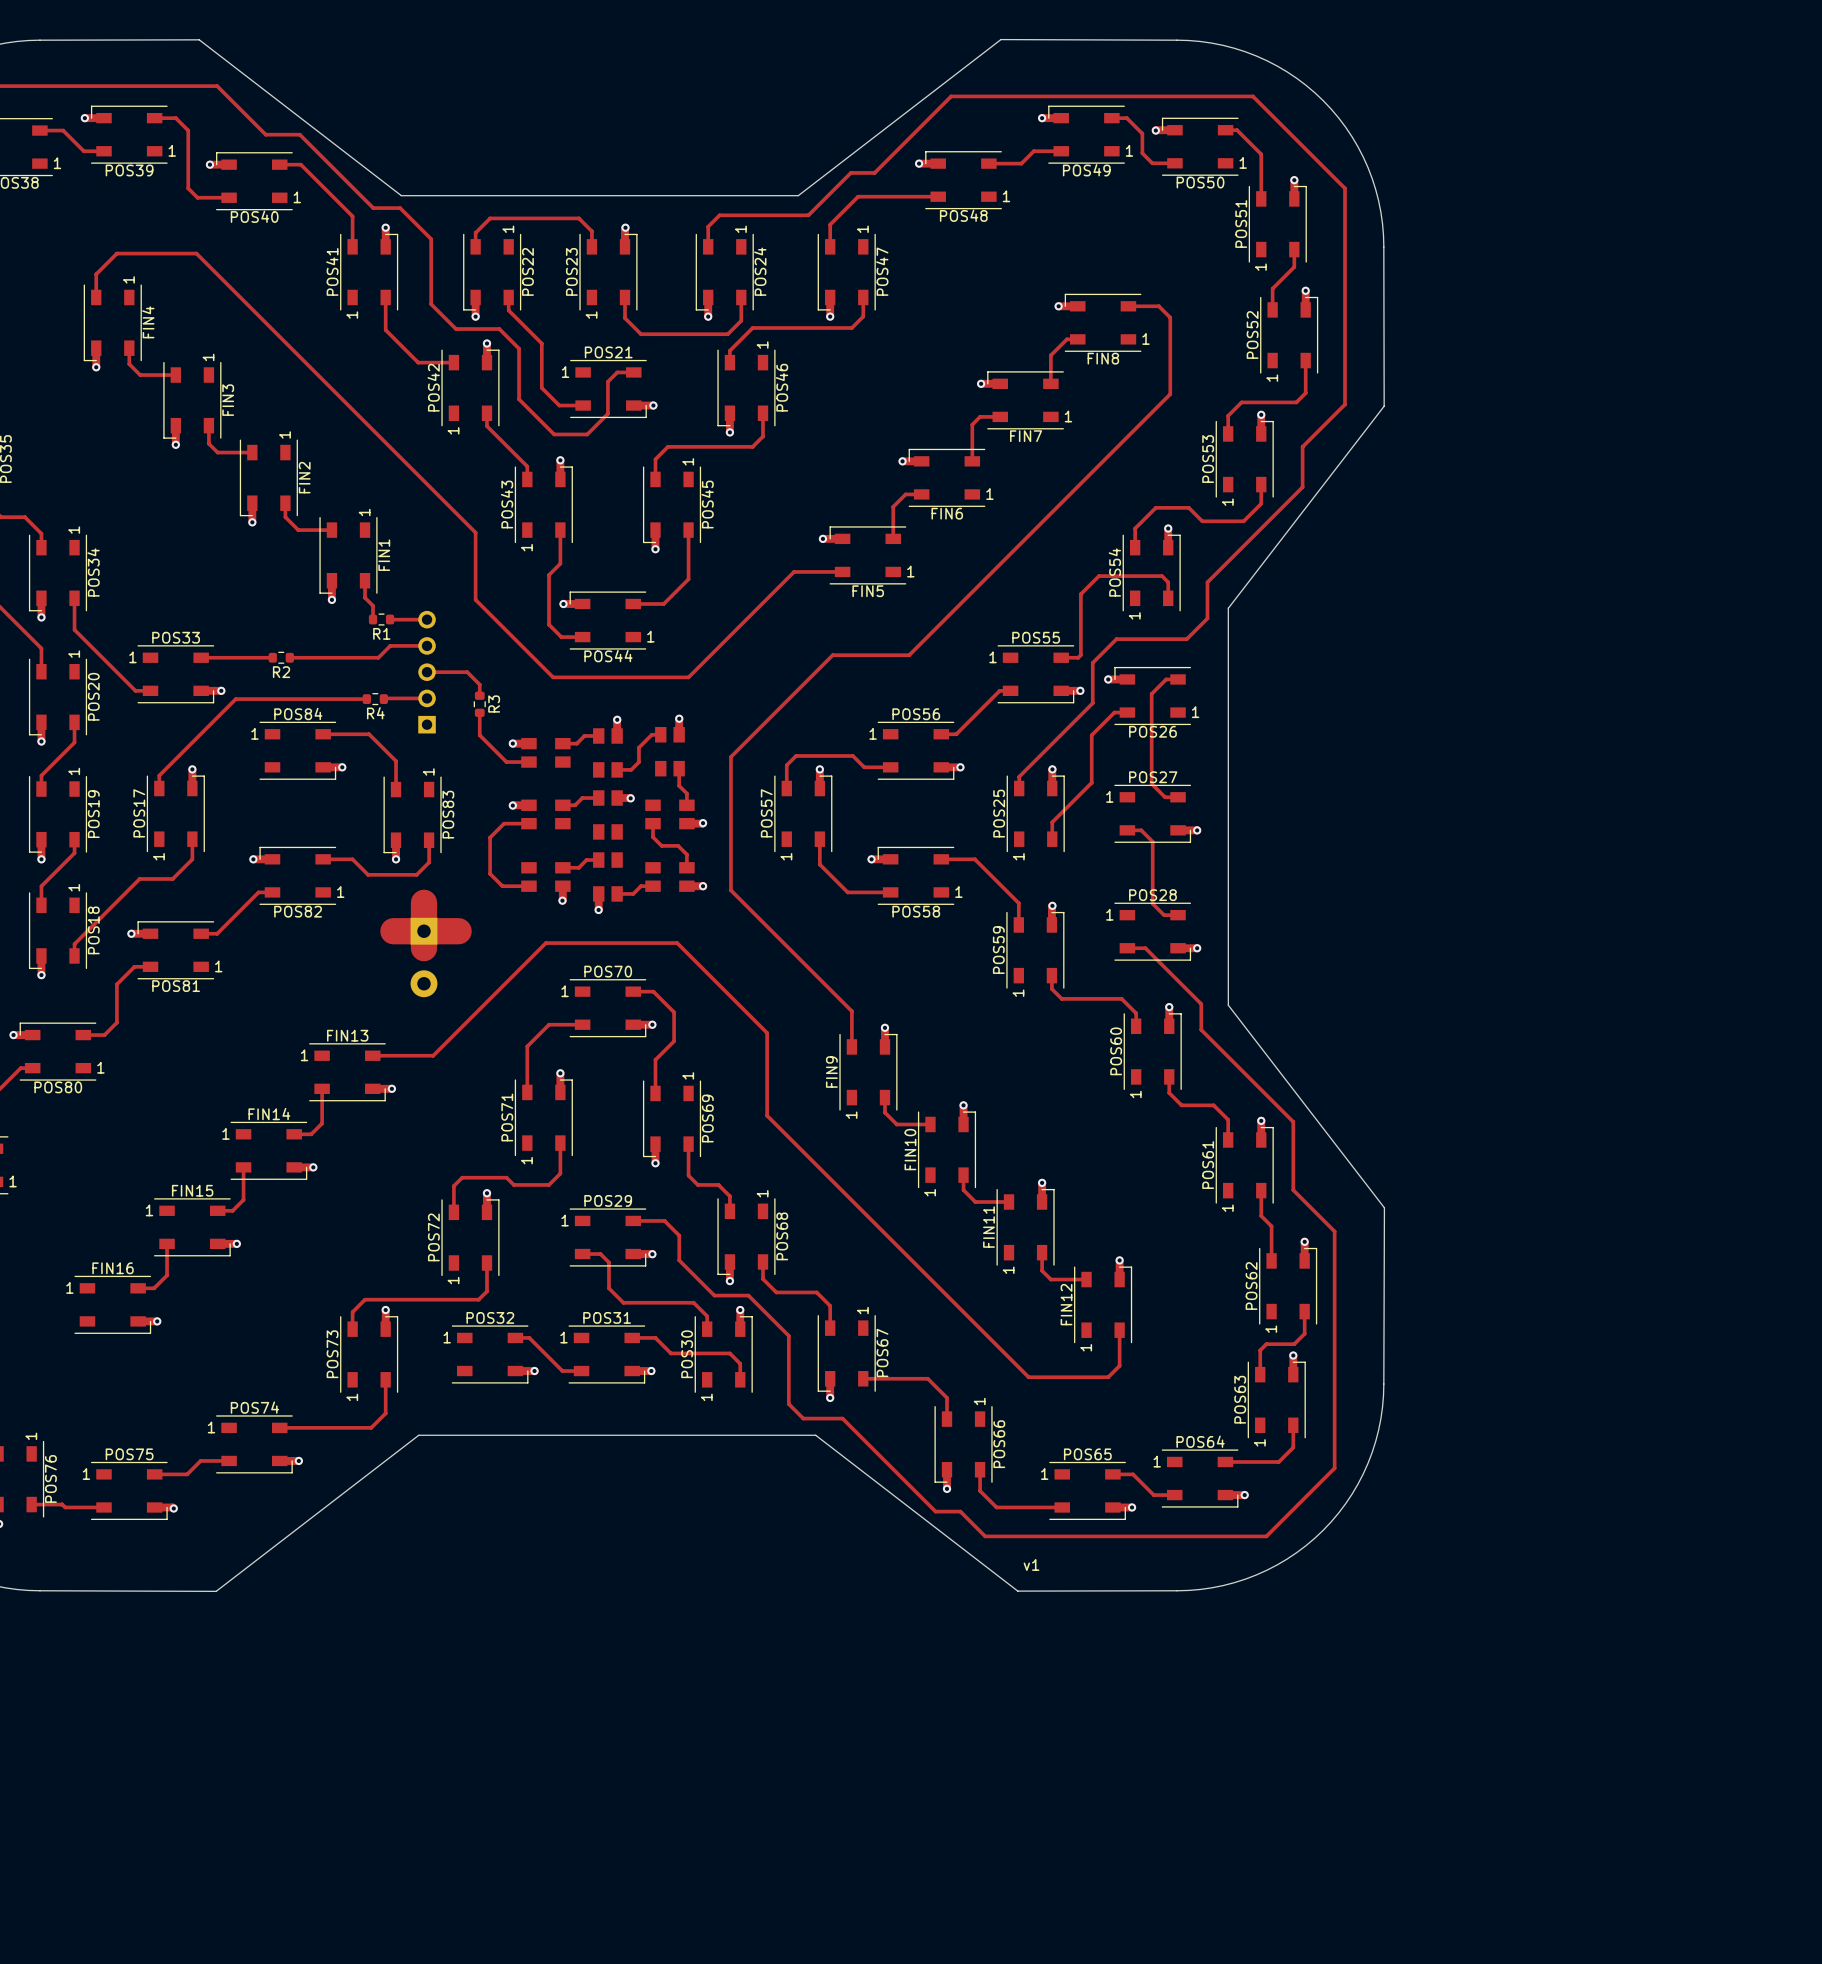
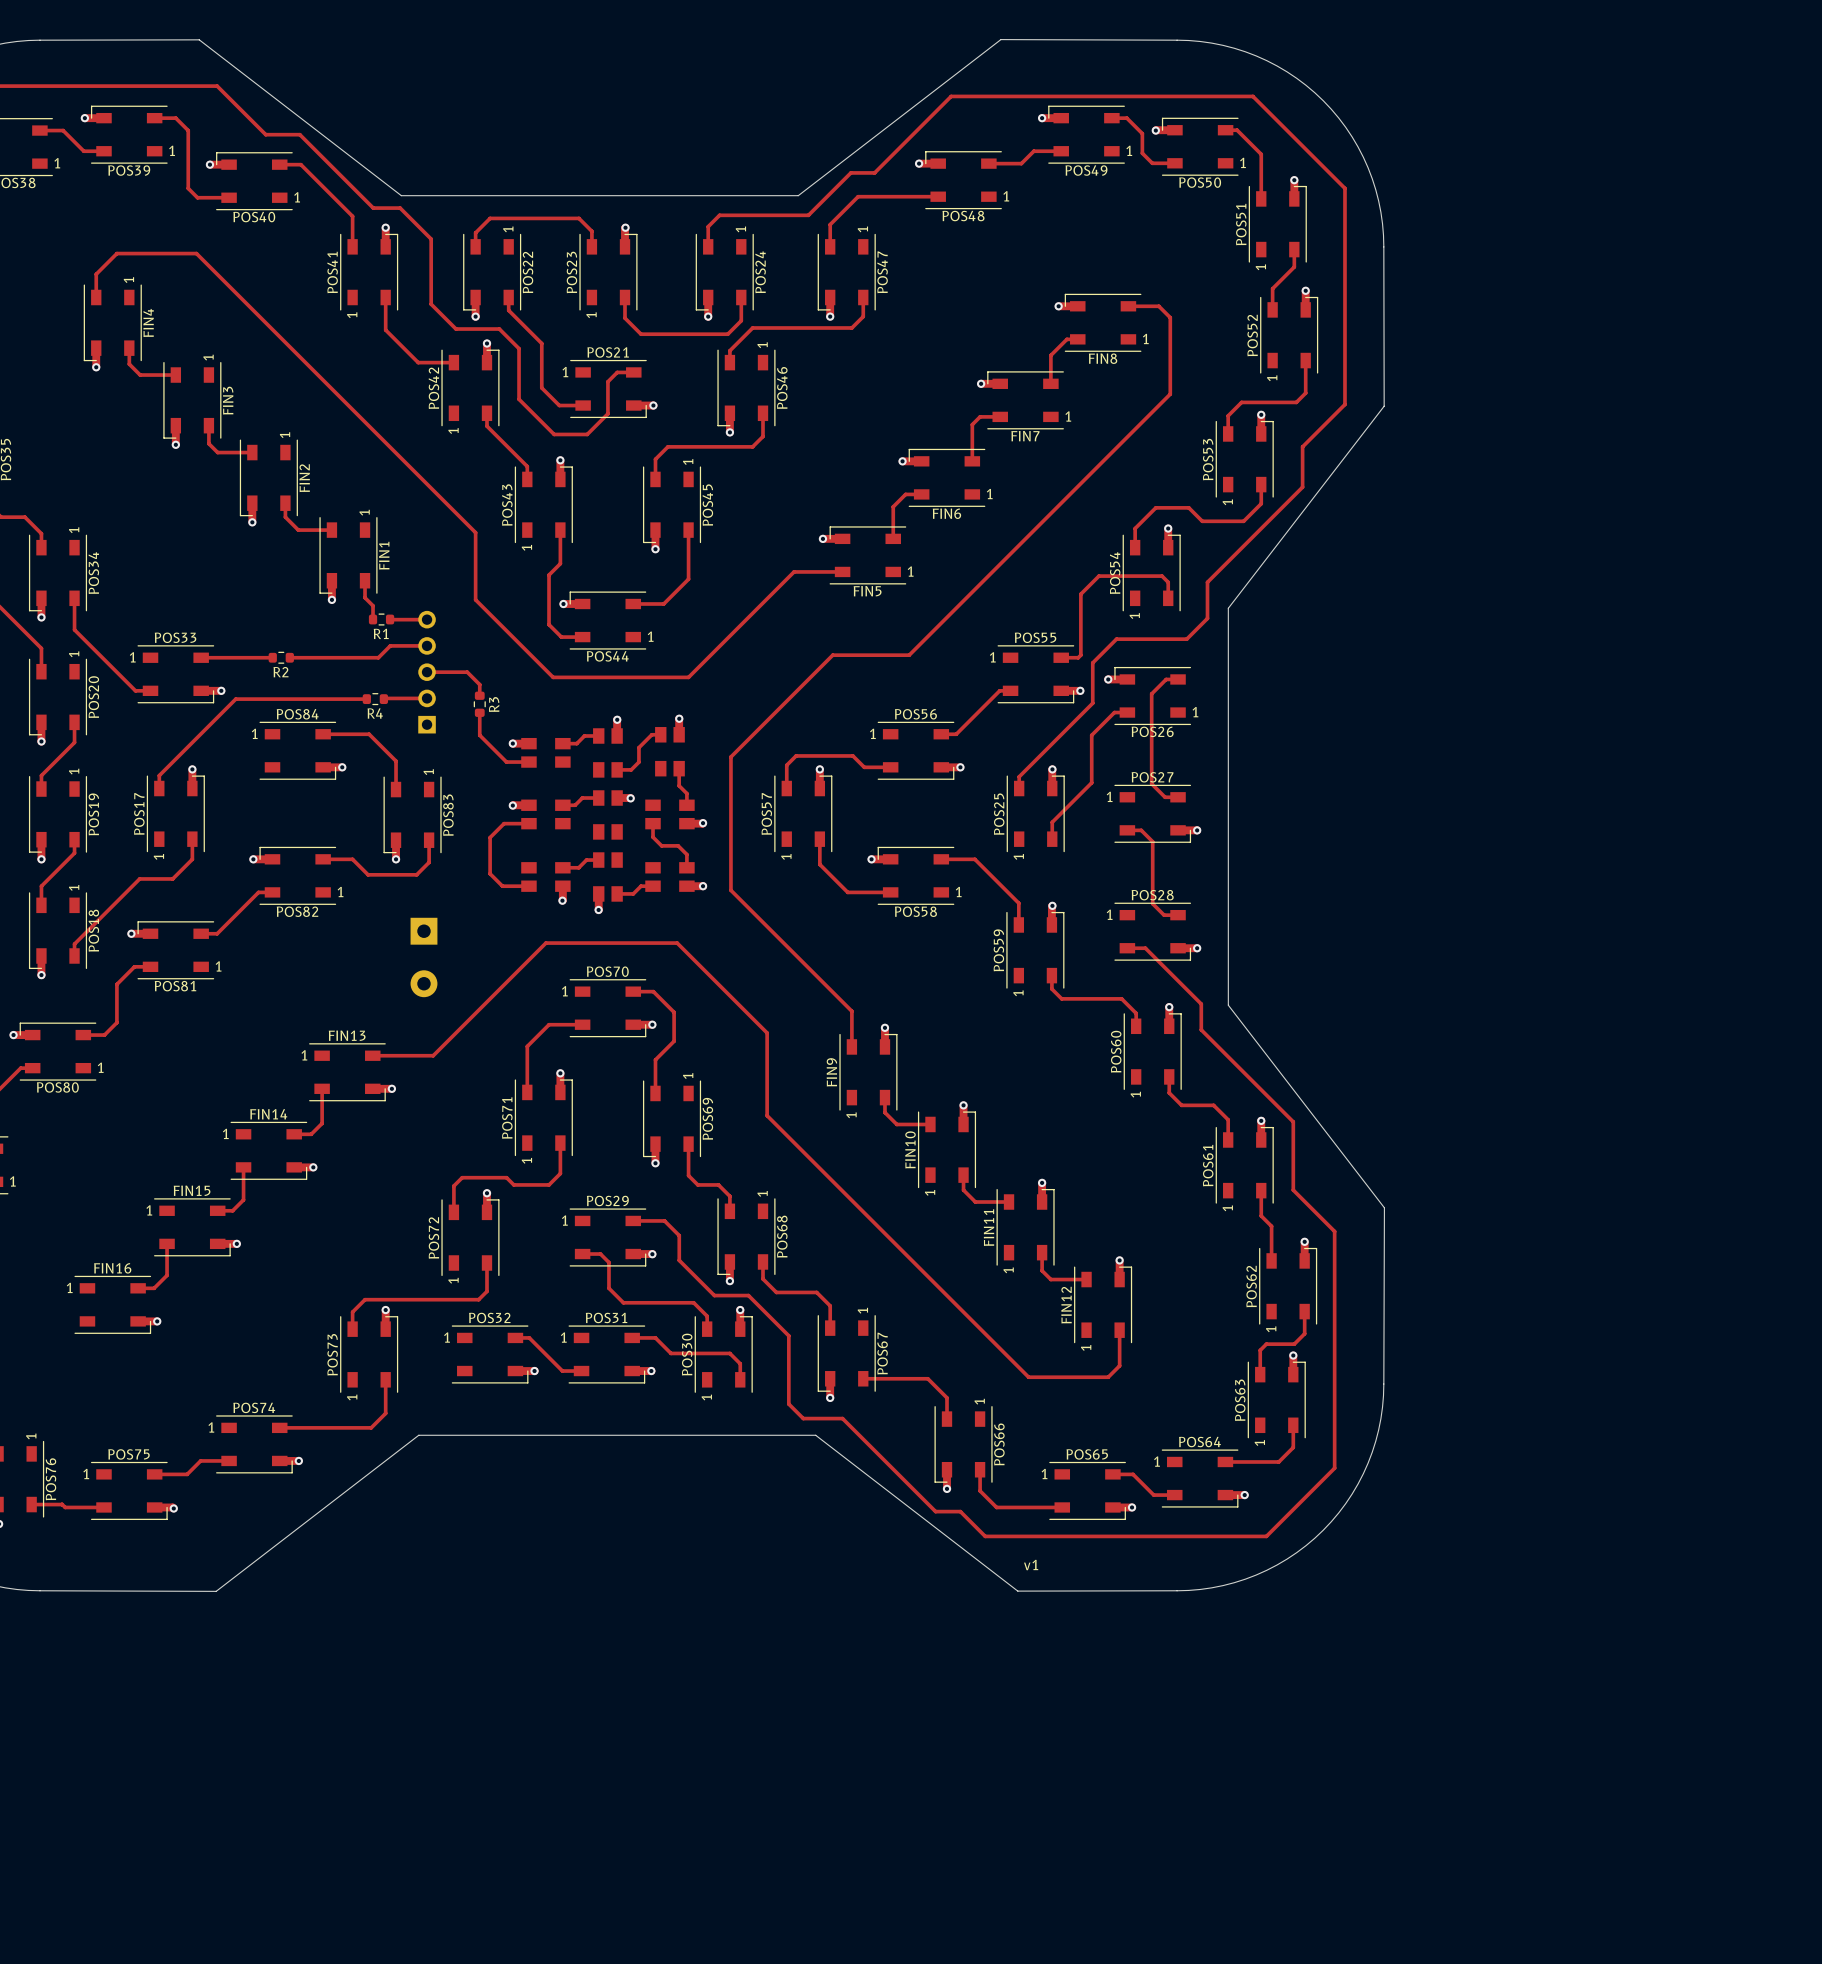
track: (423, 902) (423, 948) -> none
track: (393, 931) (458, 931) -> none

